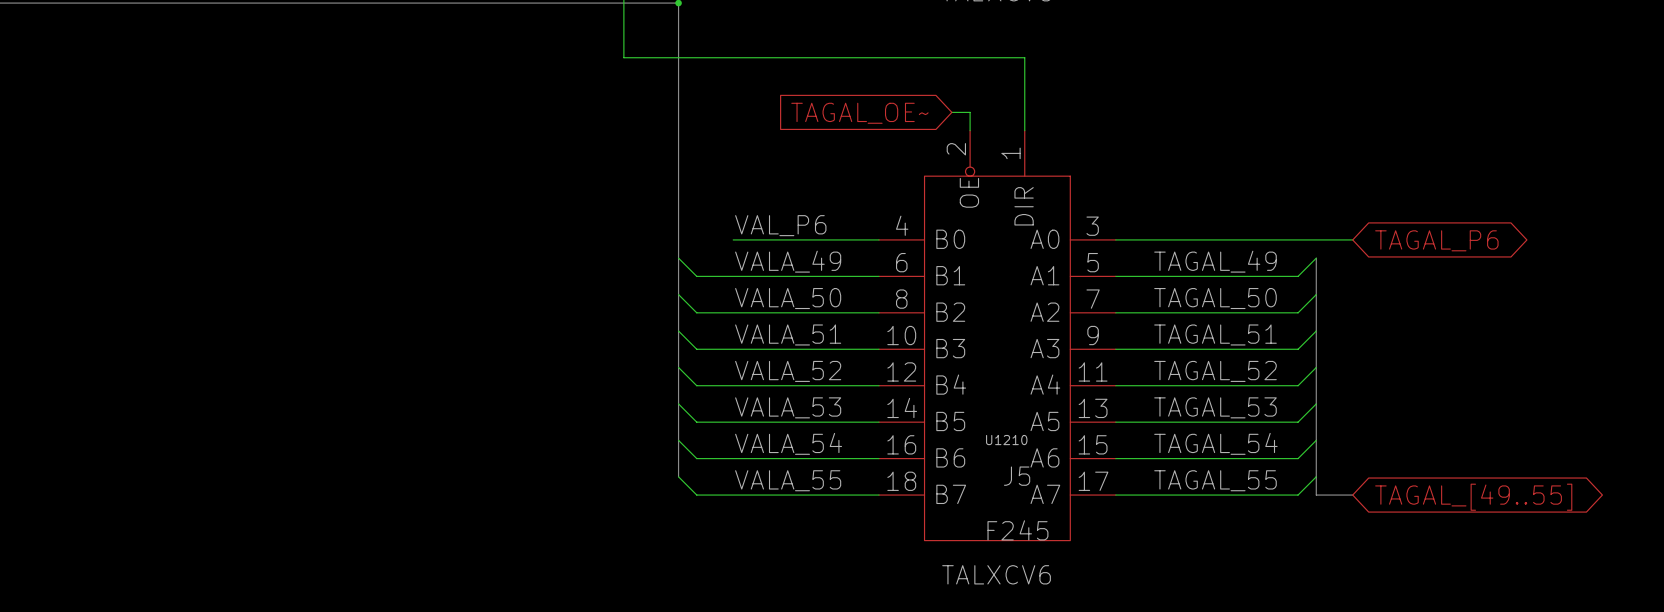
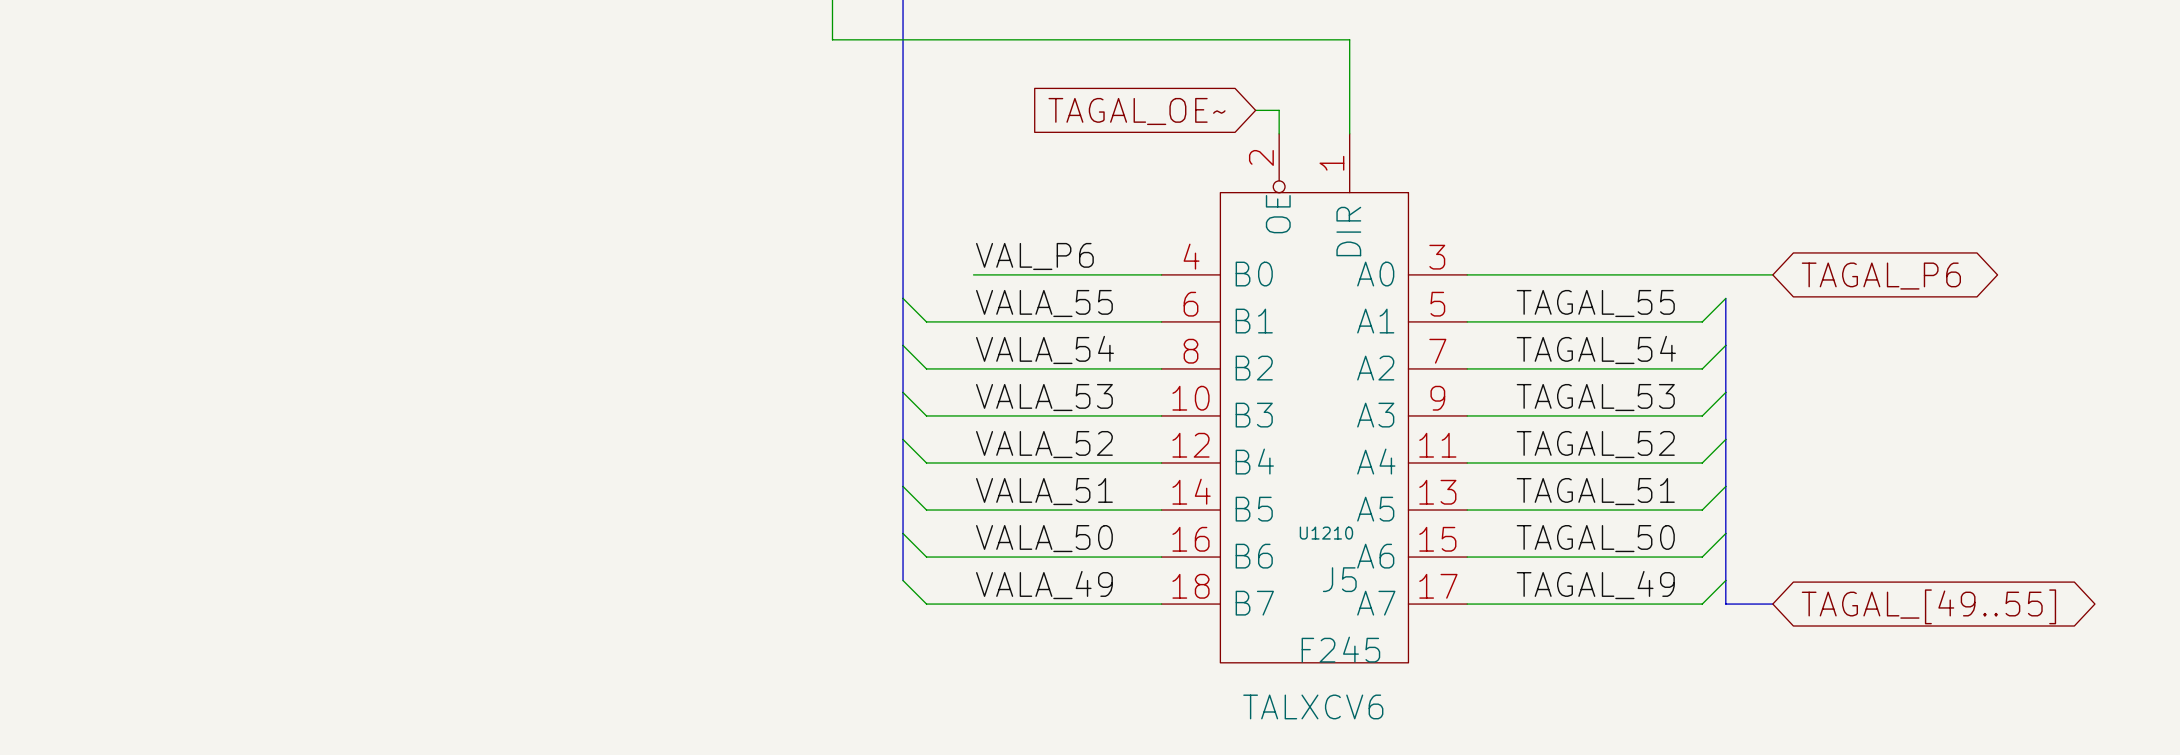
label: VALA_49 (788, 261) -> VALA_55 (1044, 303)
label: TAGAL_49 (1215, 261) -> TAGAL_55 (1595, 303)
label: VALA_50 (788, 298) -> VALA_54 (1044, 349)
label: TAGAL_50 (1215, 298) -> TAGAL_54 (1596, 349)
label: VALA_51 (788, 334) -> VALA_53 (1044, 397)
label: TAGAL_51 (1215, 334) -> TAGAL_53 (1595, 397)
label: VALA_53 (788, 407) -> VALA_51 (1044, 491)
label: TAGAL_53 (1215, 407) -> TAGAL_51 (1595, 491)
label: VALA_54 (788, 443) -> VALA_50 (1044, 538)
label: TAGAL_54 (1215, 443) -> TAGAL_50 (1595, 538)
label: VALA_55 (788, 480) -> VALA_49 (1044, 585)
label: TAGAL_55 (1215, 480) -> TAGAL_49 (1595, 585)

